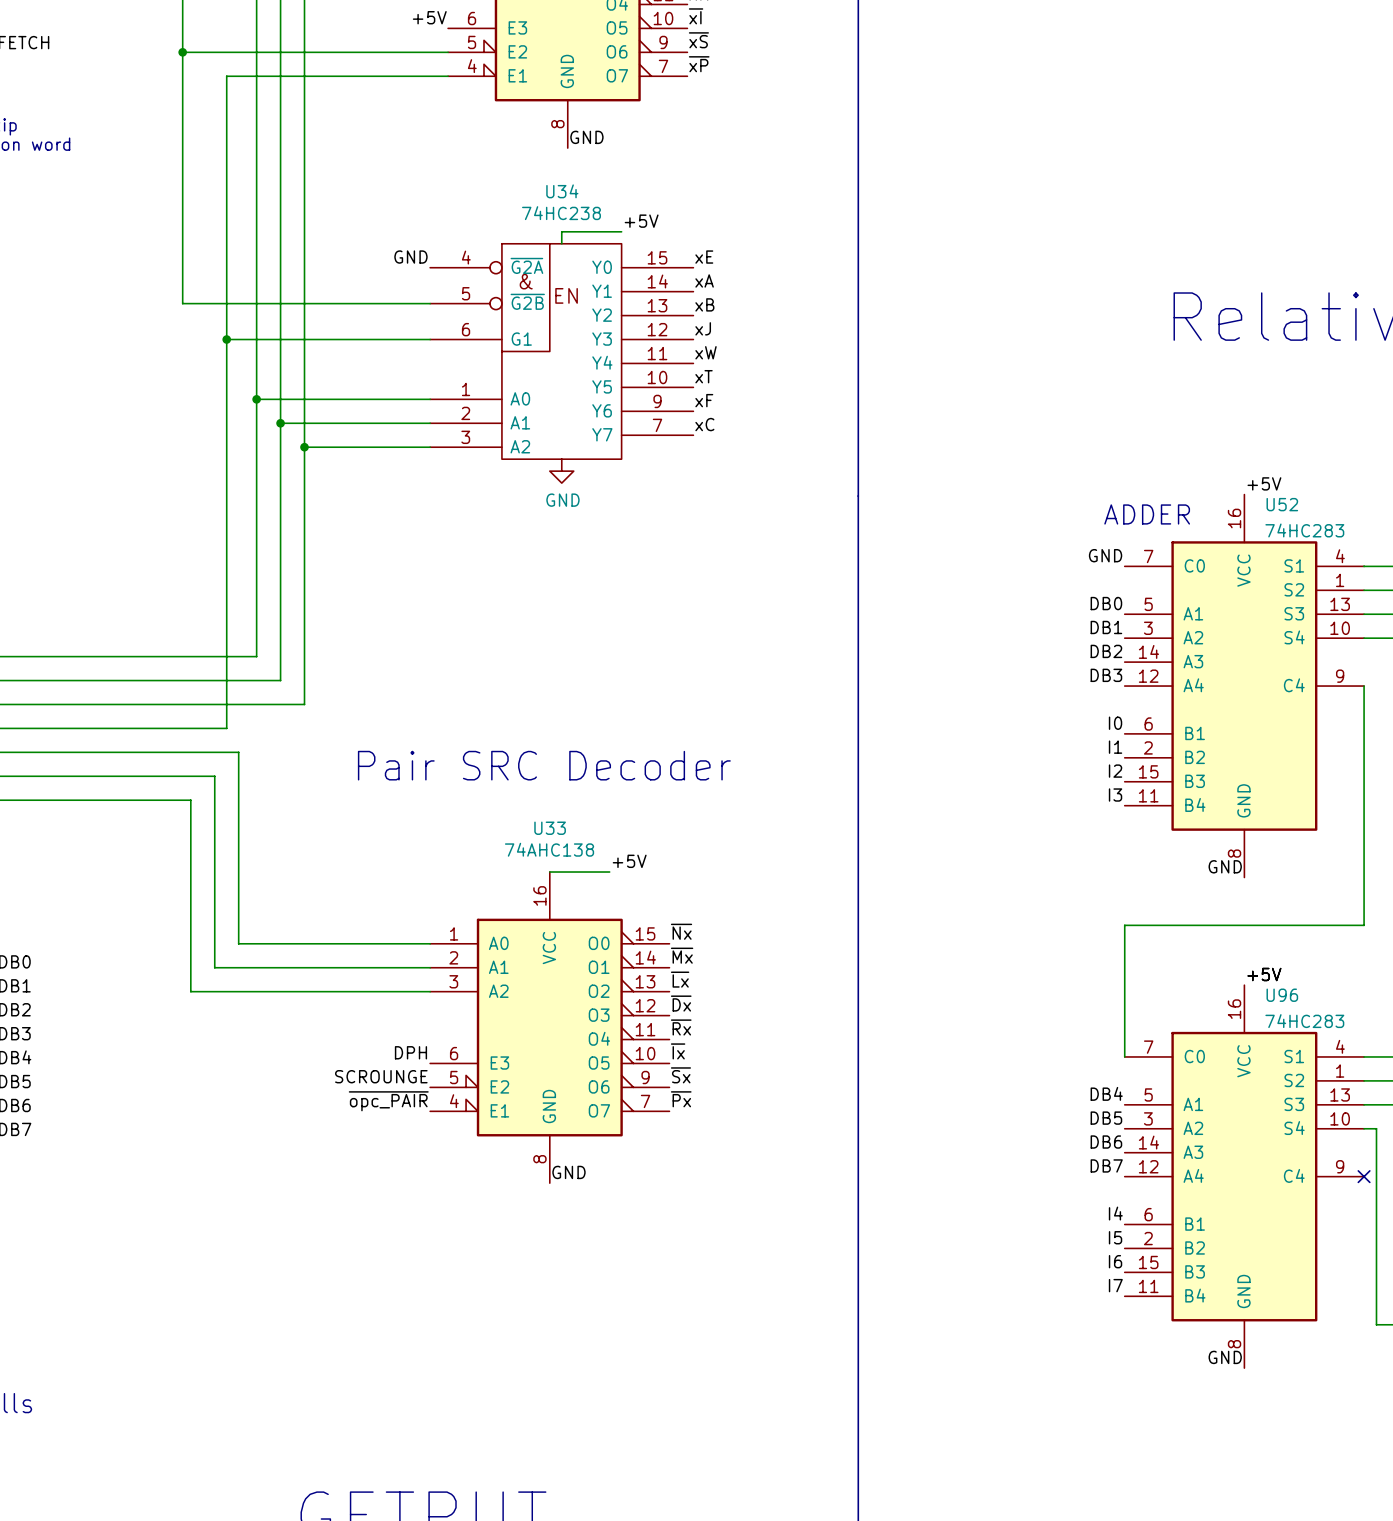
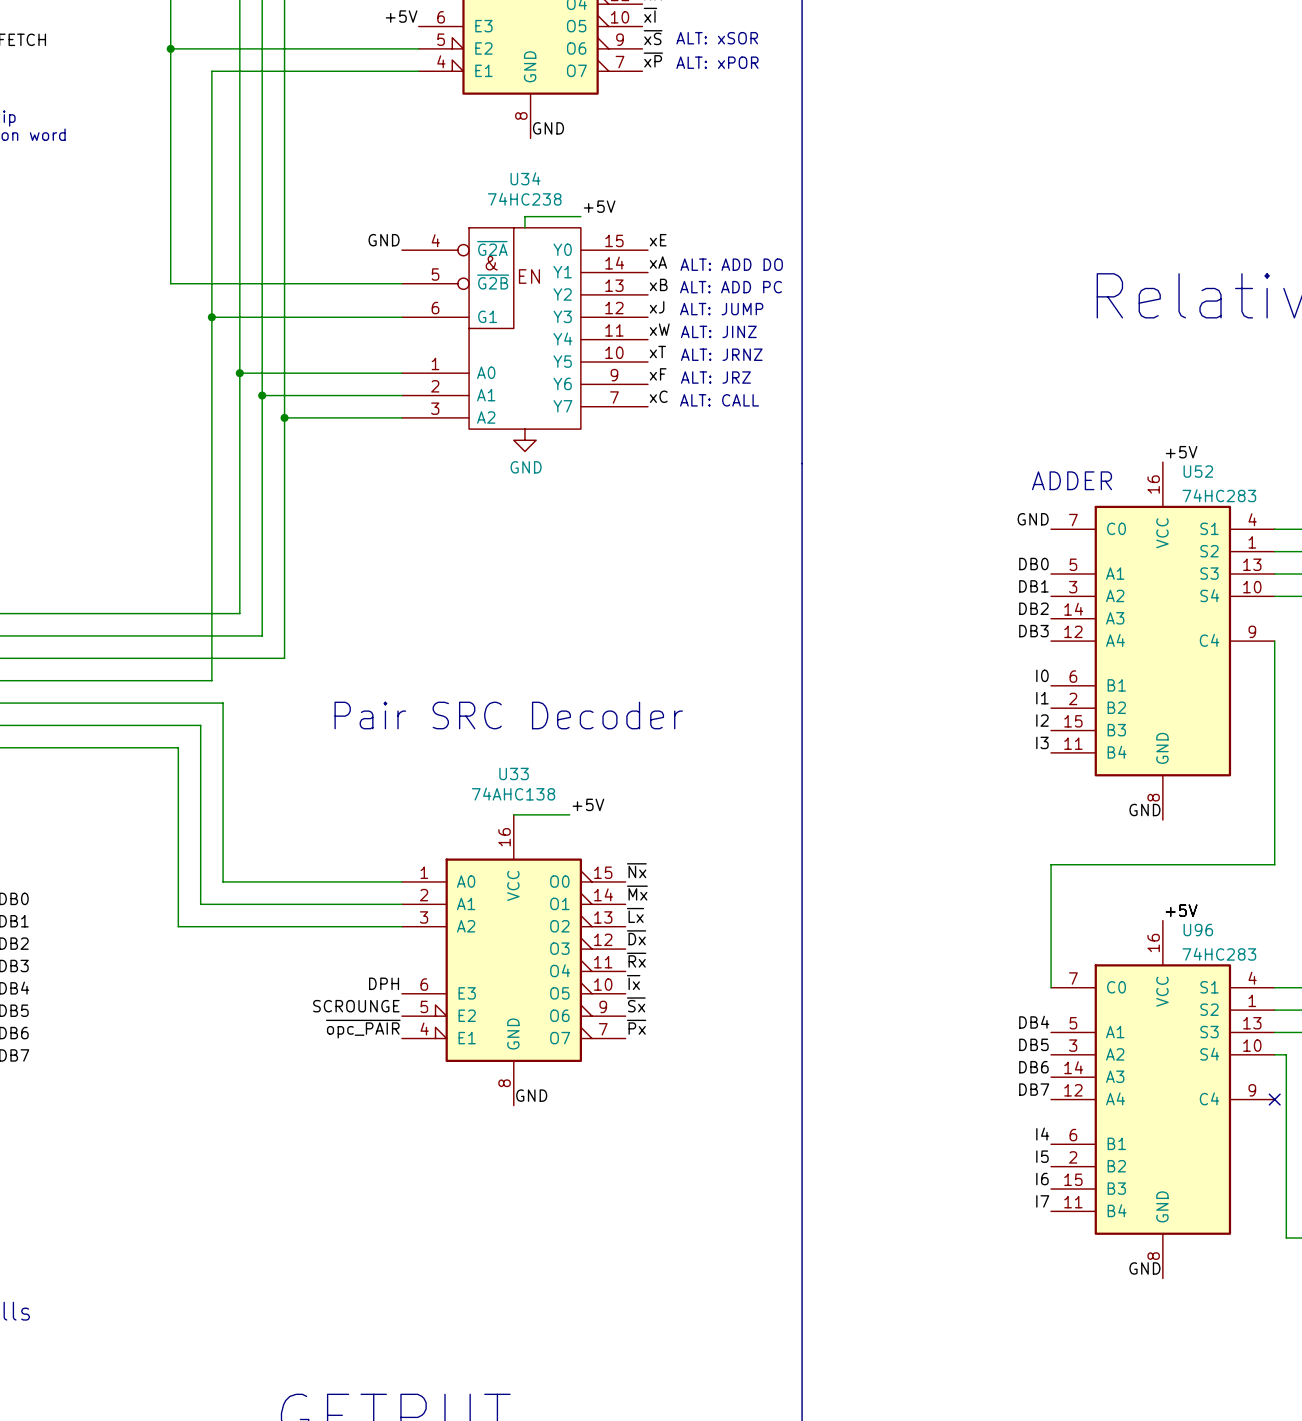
text: none -> ALT: xSOR (717, 38)
text: none -> ALT: xPOR (717, 62)
text: none -> ALT: ADD DO (731, 264)
text: none -> ALT: ADD PC (731, 287)
text: none -> ALT: JUMP (721, 309)
text: none -> ALT: JINZ (718, 331)
text: none -> ALT: JRNZ (721, 354)
text: none -> ALT: JRZ (715, 377)
text: none -> ALT: CALL (719, 400)

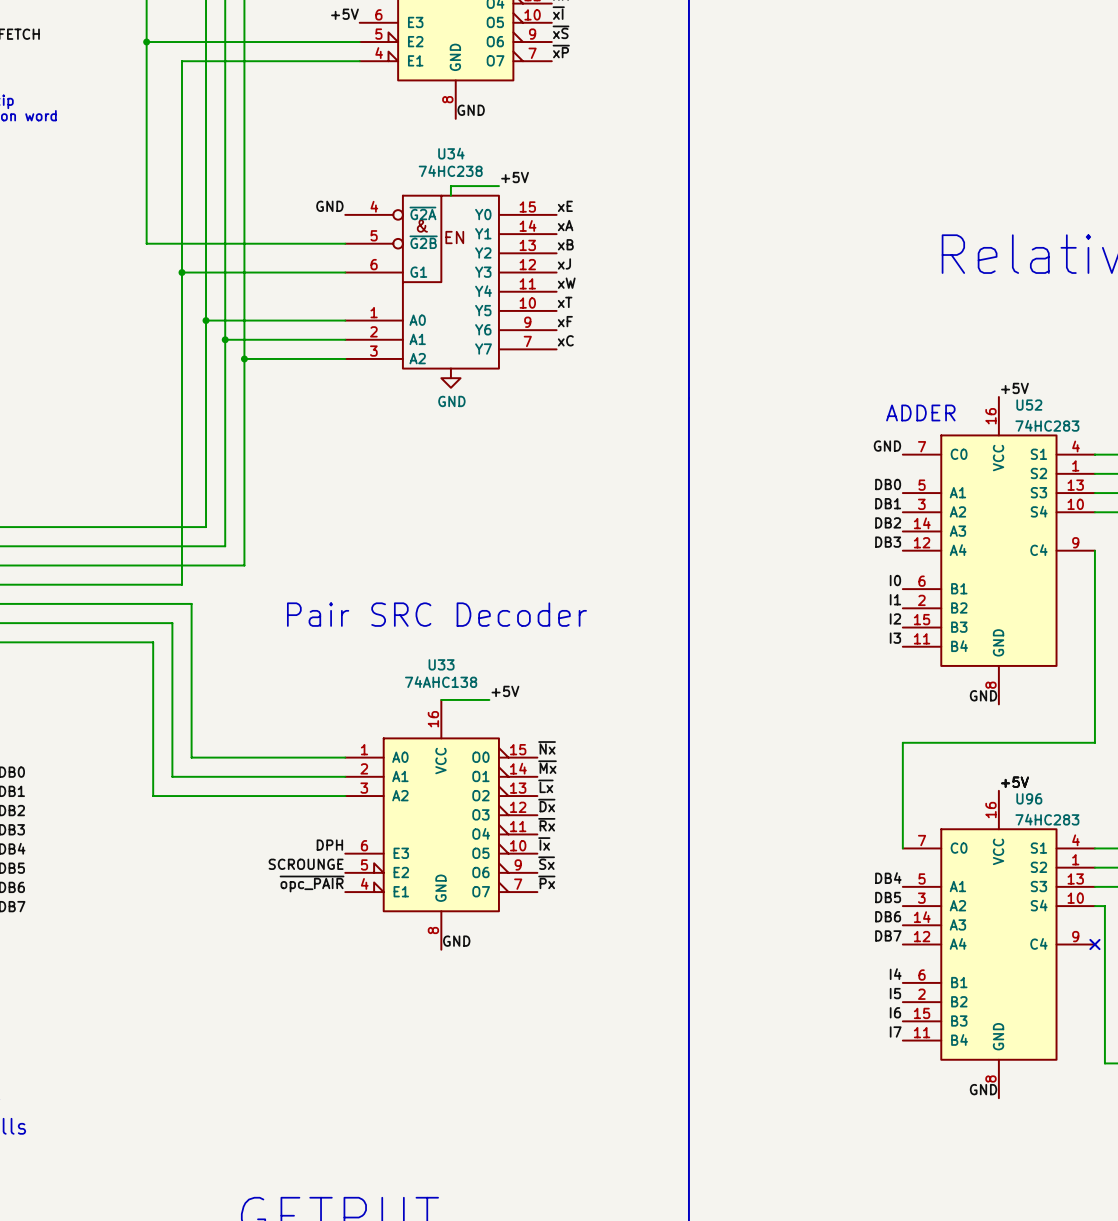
text: ALT: xSOR (717, 38) -> none
text: ALT: xPOR (717, 62) -> none
text: ALT: ADD DO (731, 264) -> none
text: ALT: ADD PC (731, 287) -> none
text: ALT: JUMP (721, 309) -> none
text: ALT: JINZ (718, 331) -> none
text: ALT: JRNZ (721, 354) -> none
text: ALT: JRZ (715, 377) -> none
text: ALT: CALL (719, 400) -> none

